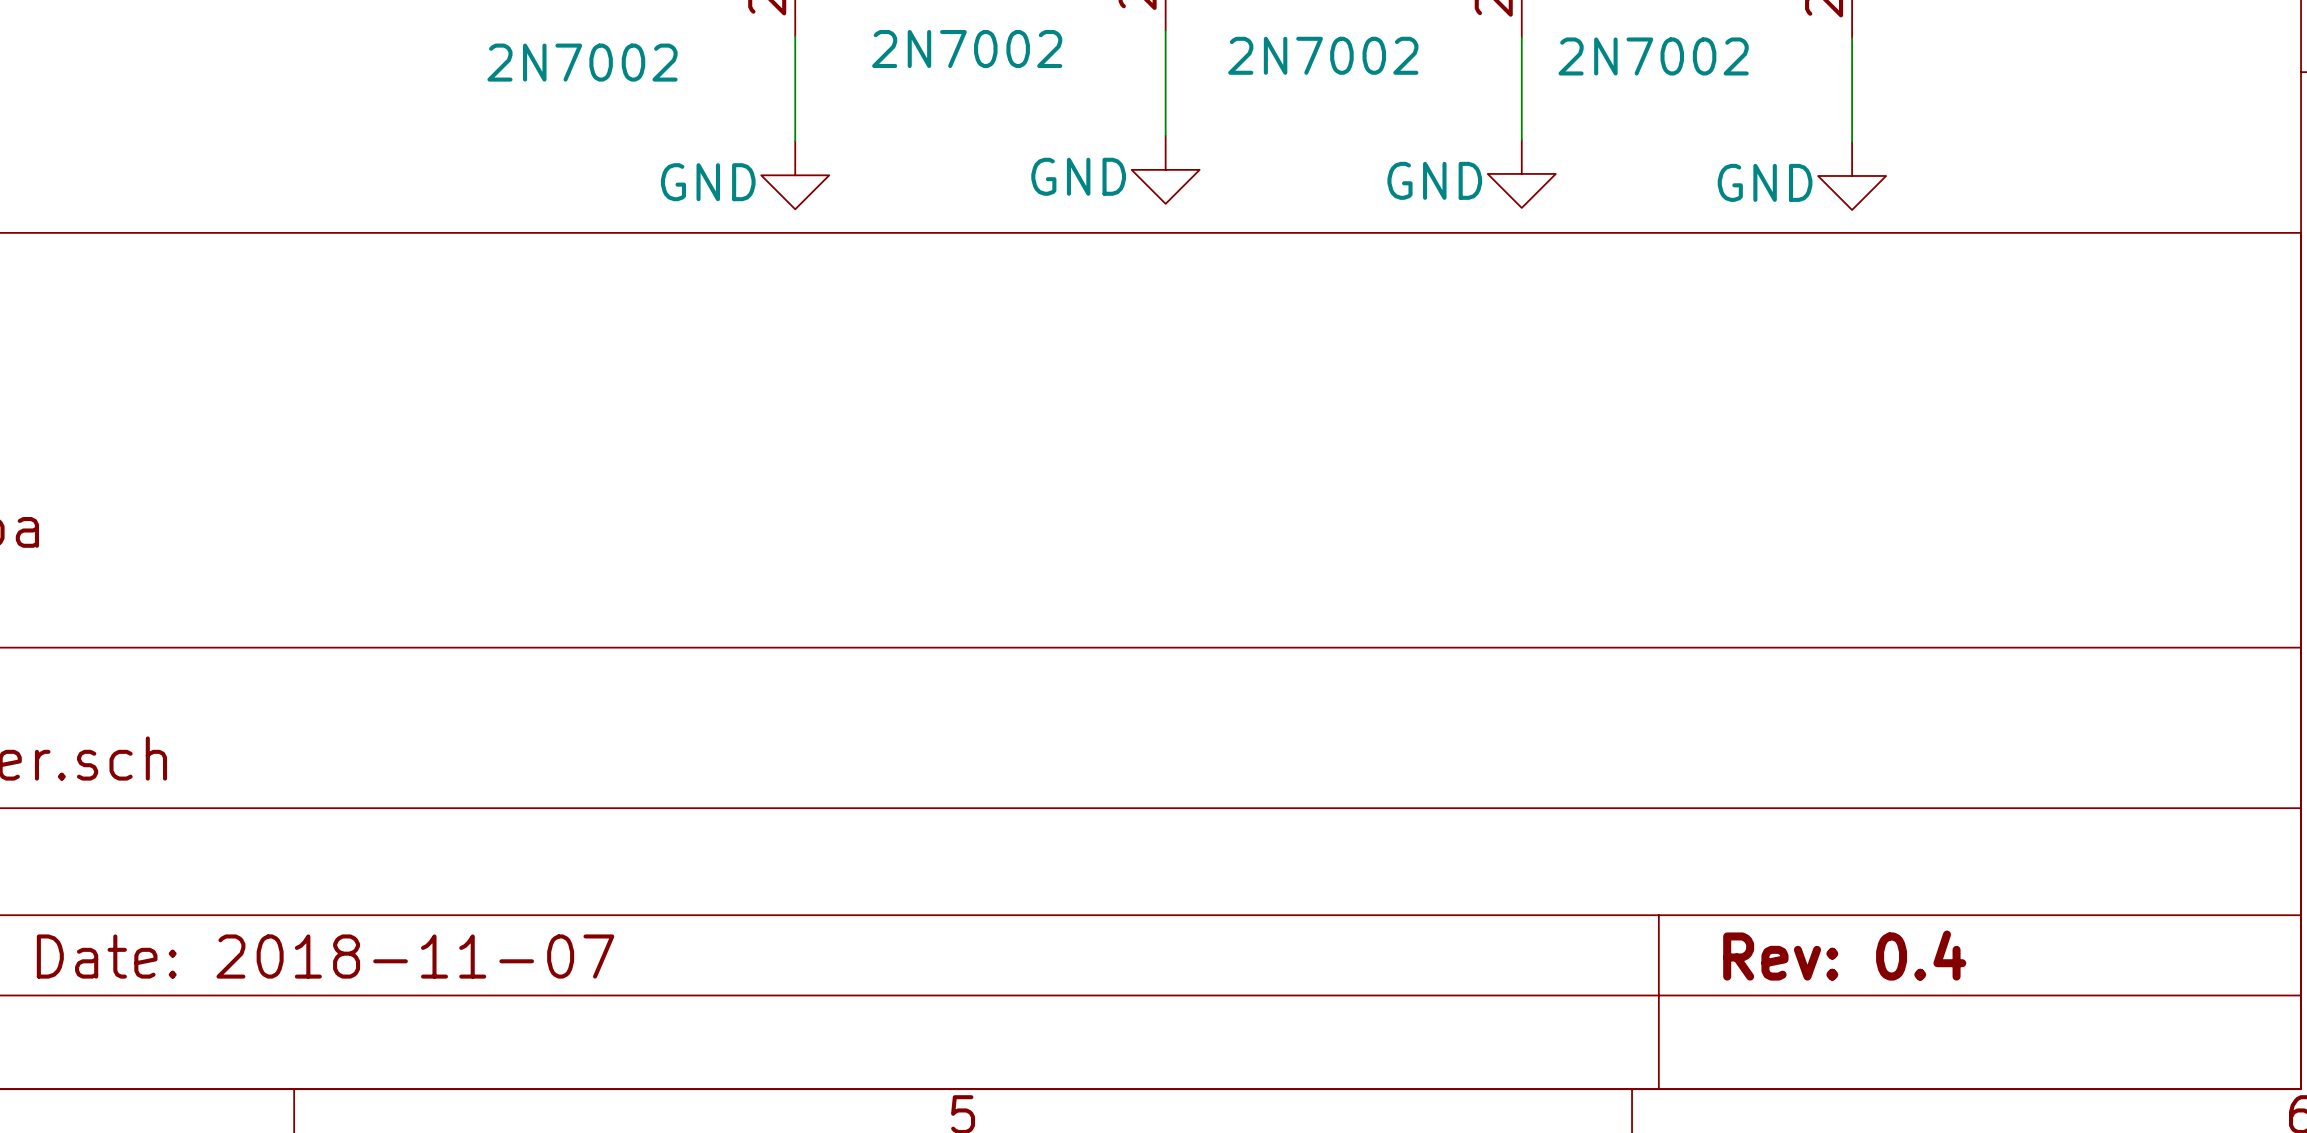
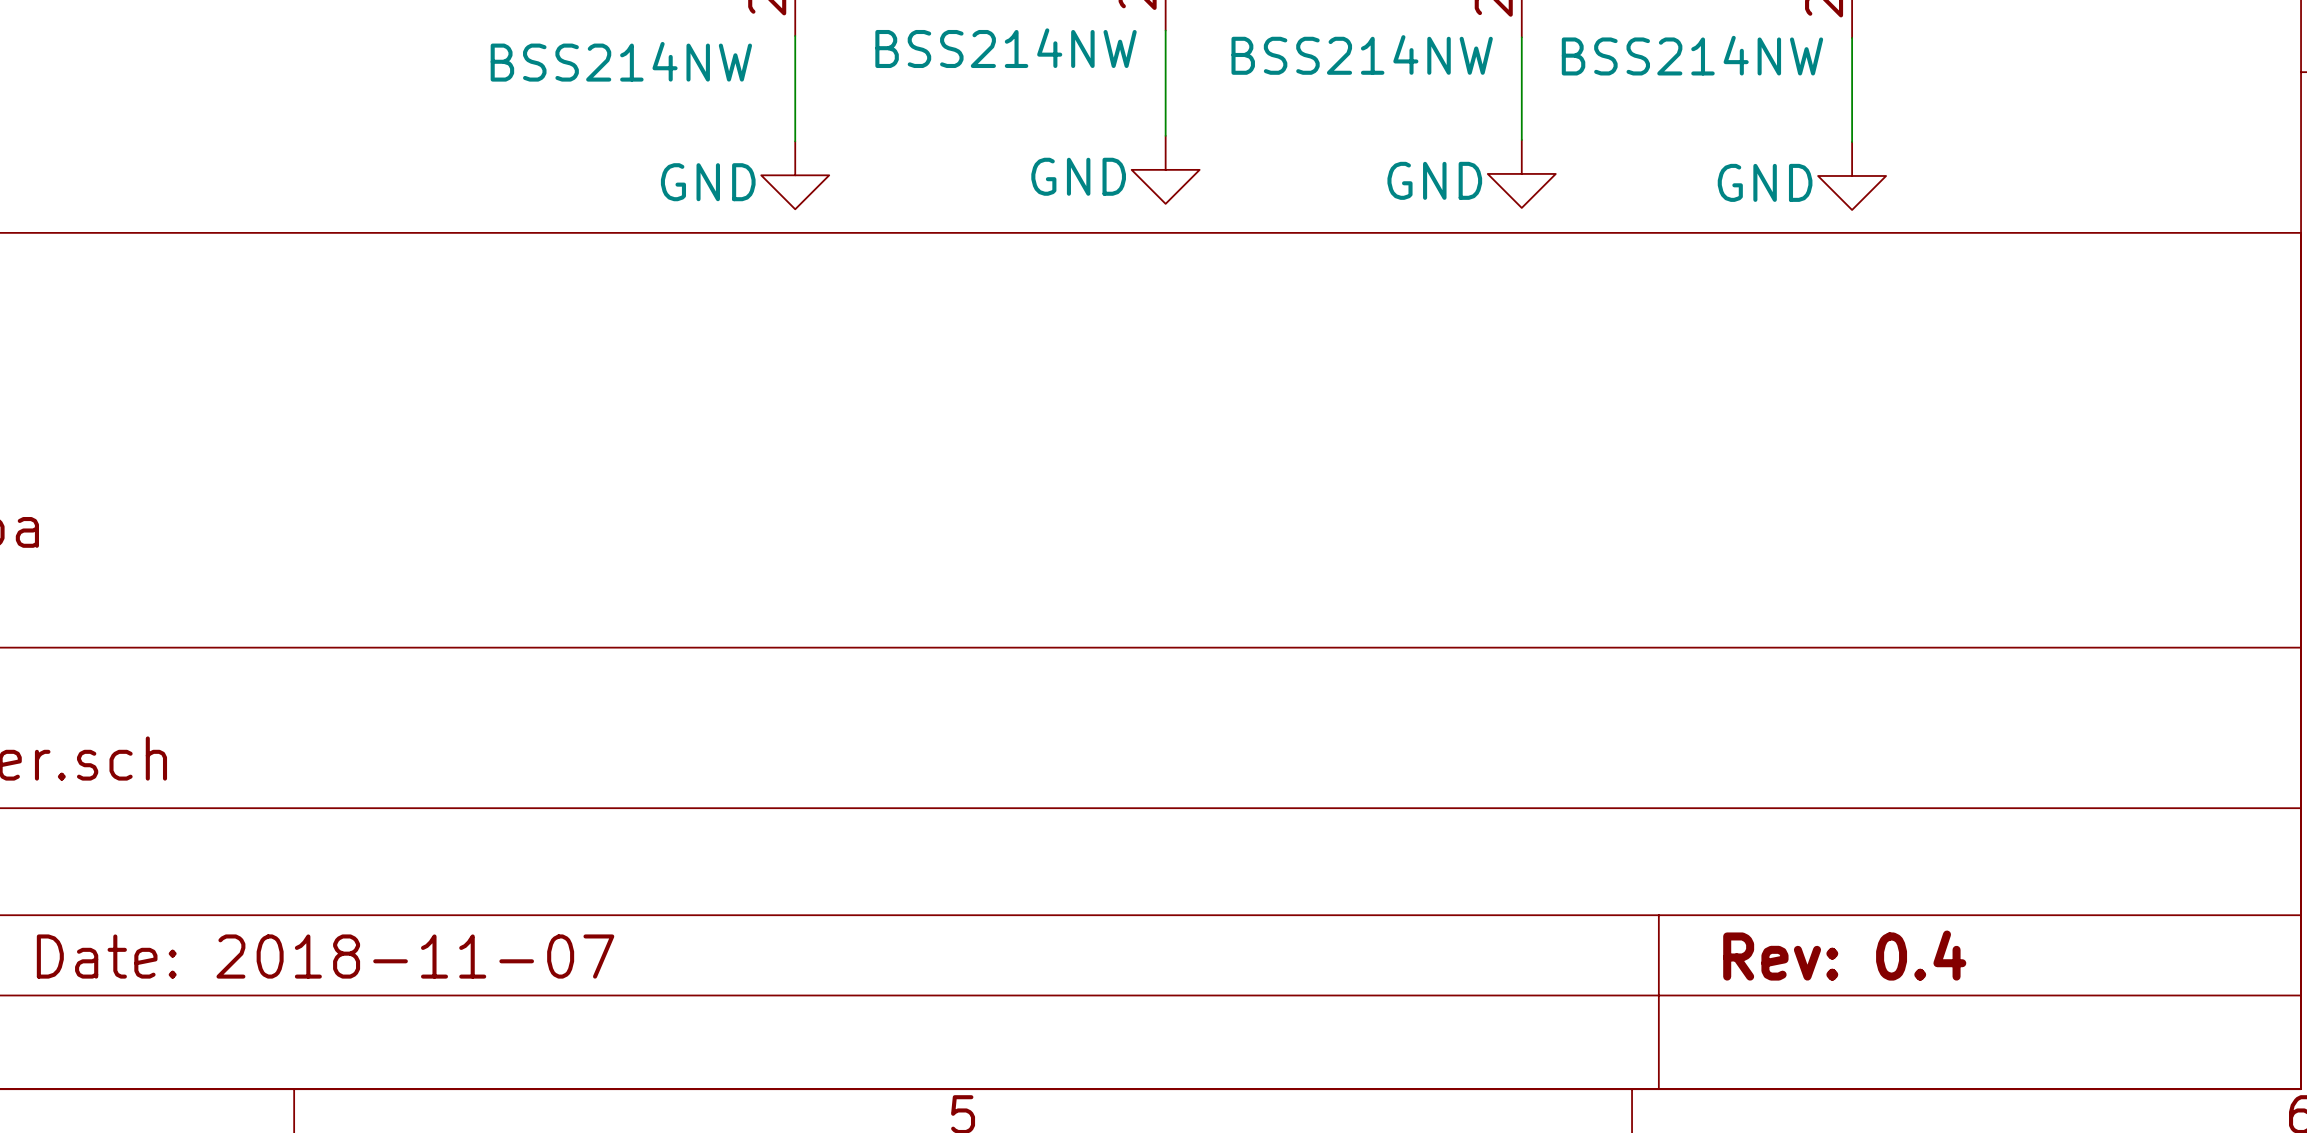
part value: 2N7002 (967, 48) -> BSS214NW (1006, 48)
part value: 2N7002 (1323, 55) -> BSS214NW (1362, 54)
part value: 2N7002 (1653, 56) -> BSS214NW (1692, 55)
part value: 2N7002 (582, 62) -> BSS214NW (621, 61)

